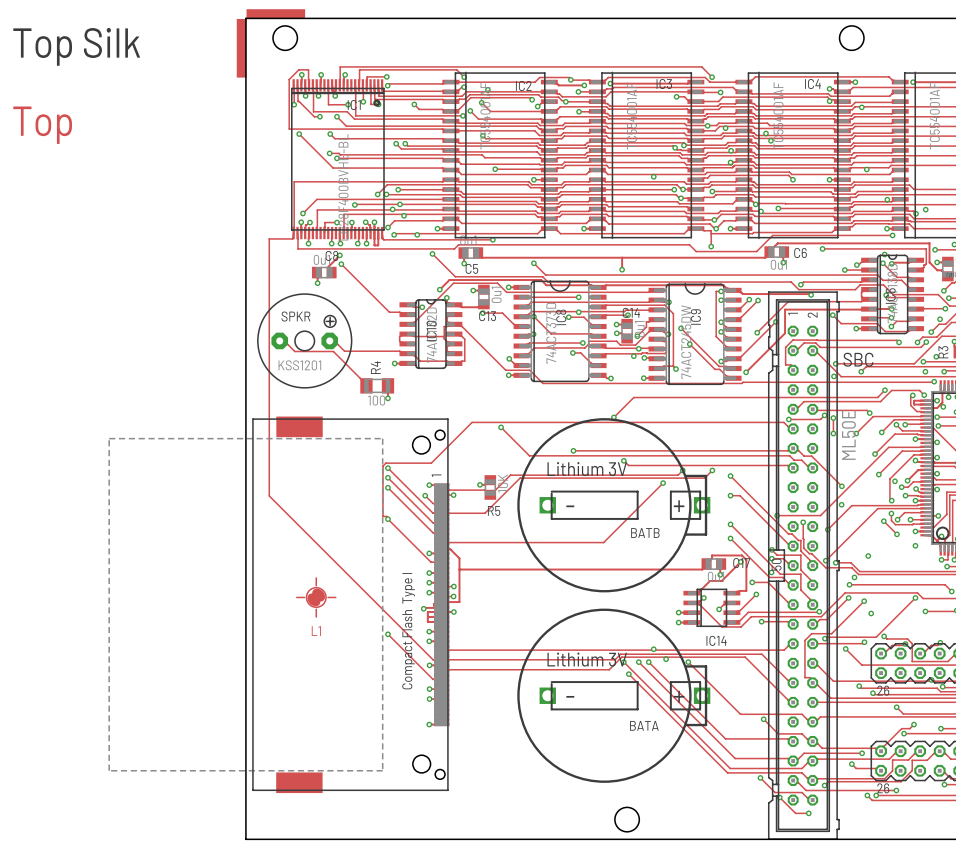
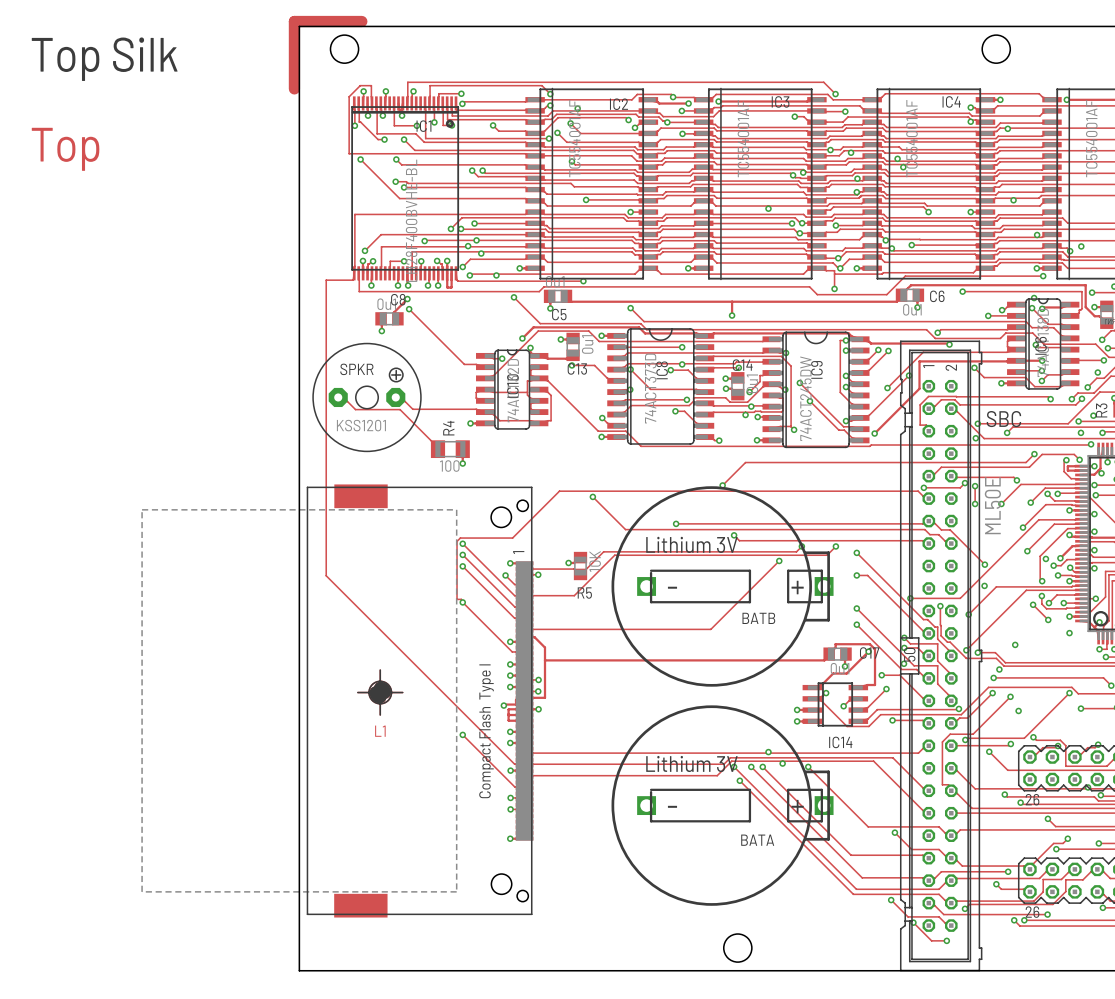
drawing shape: [236, 9, 306, 78] -> [288, 15, 368, 95]
IC8 footprint: [513, 280, 607, 382] -> [607, 328, 715, 445]
IC9 footprint: [648, 283, 742, 385] -> [762, 331, 870, 449]
drawing shape: [296, 577, 337, 618] -> [357, 669, 404, 716]

